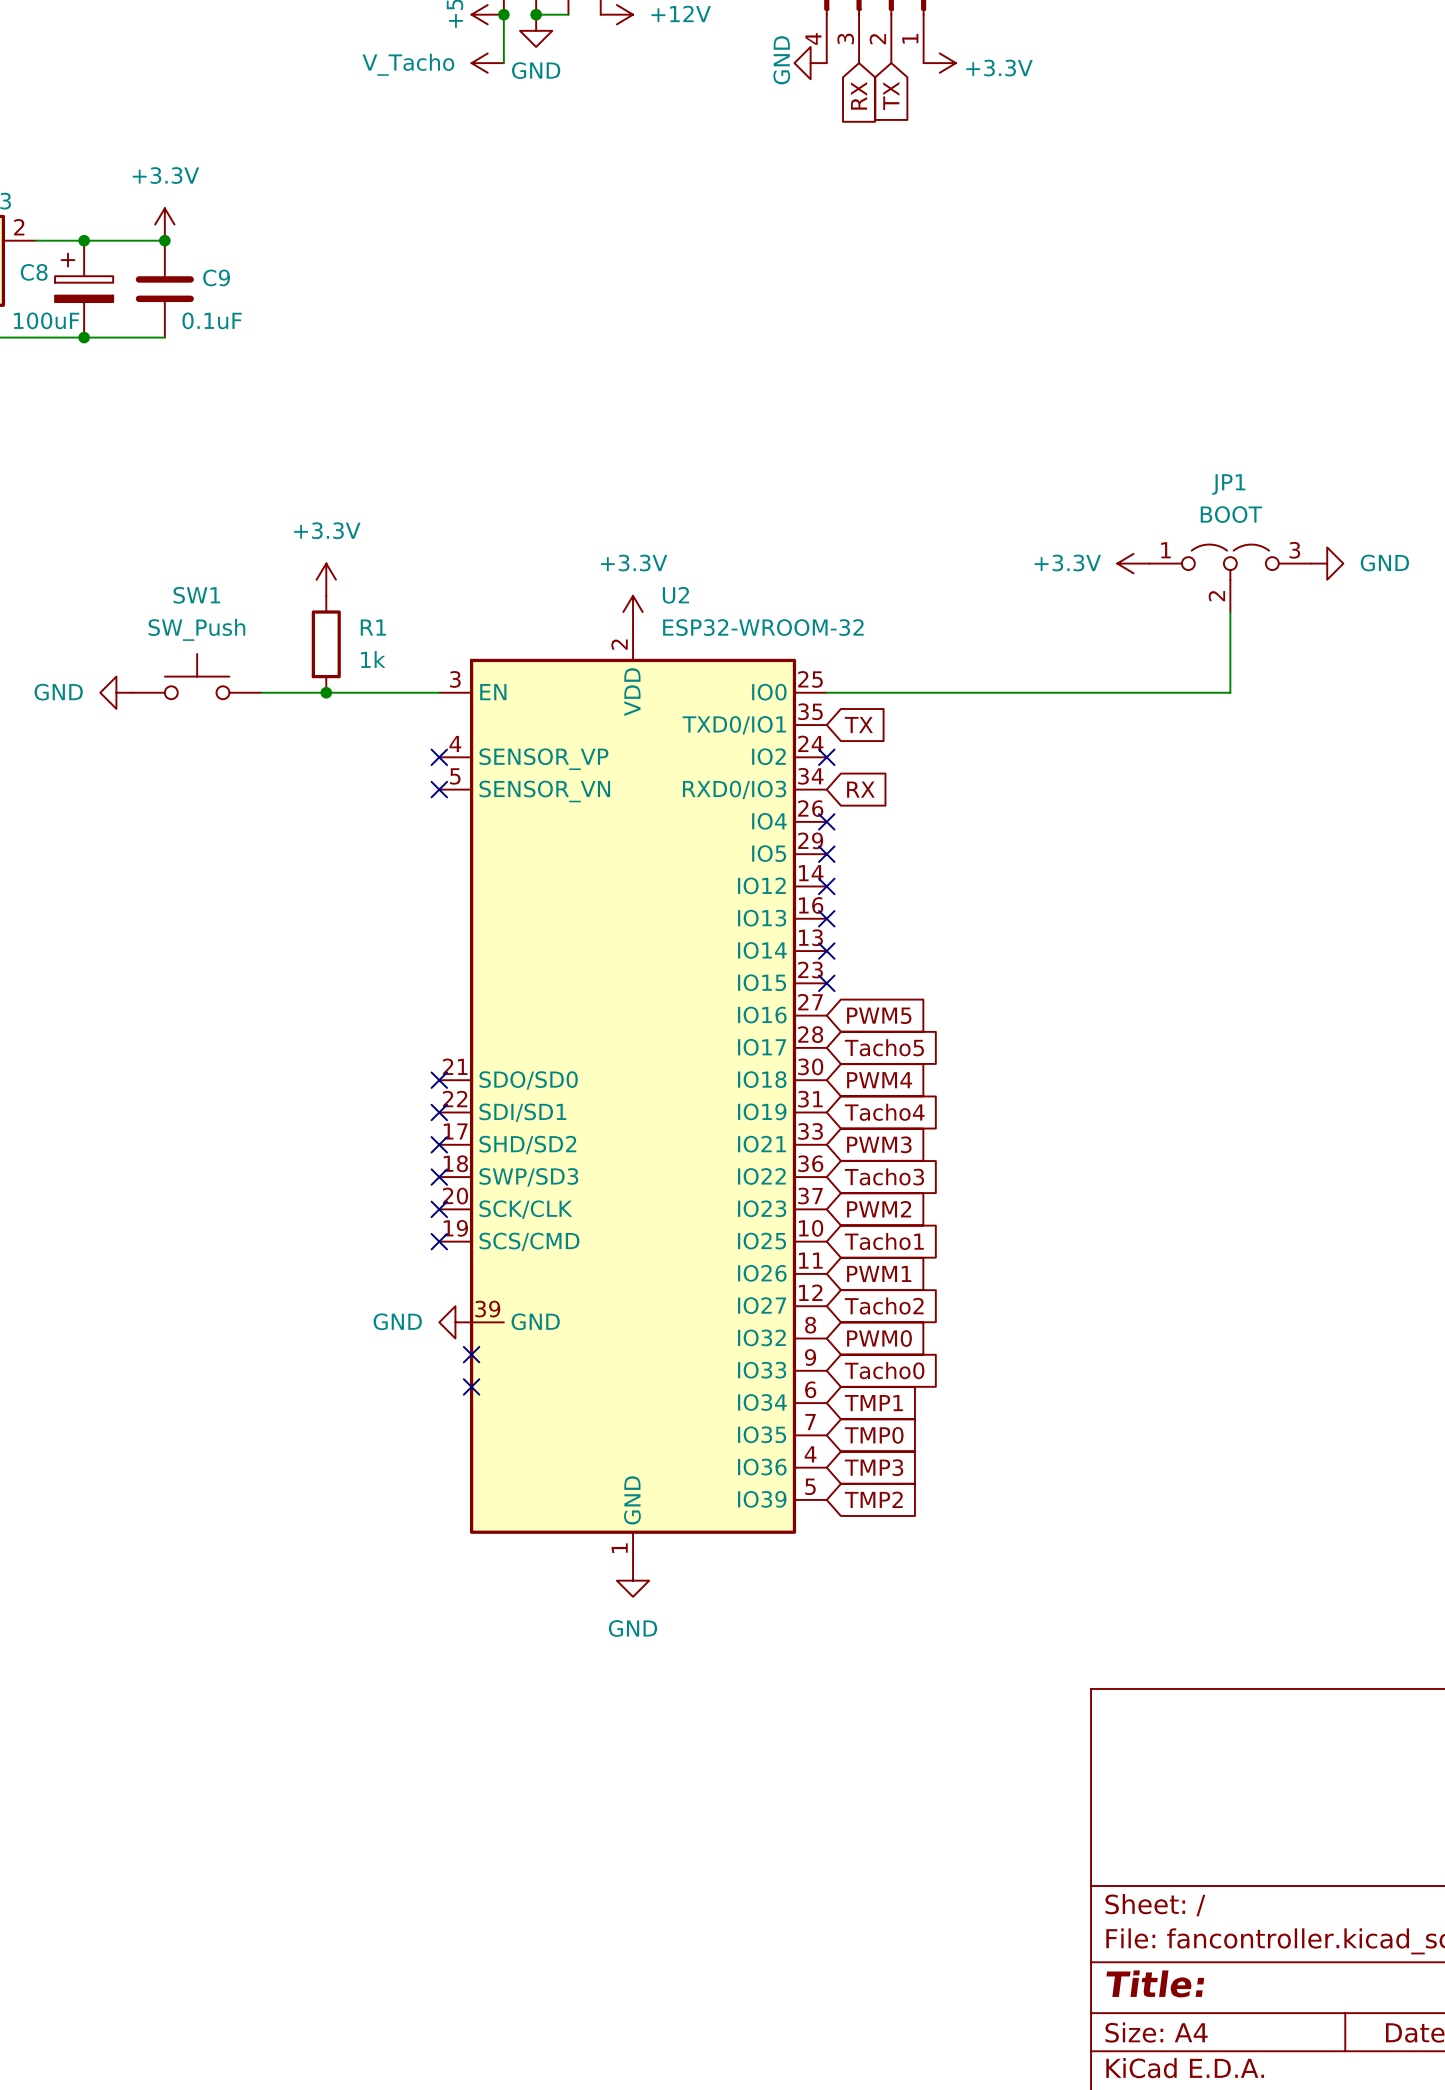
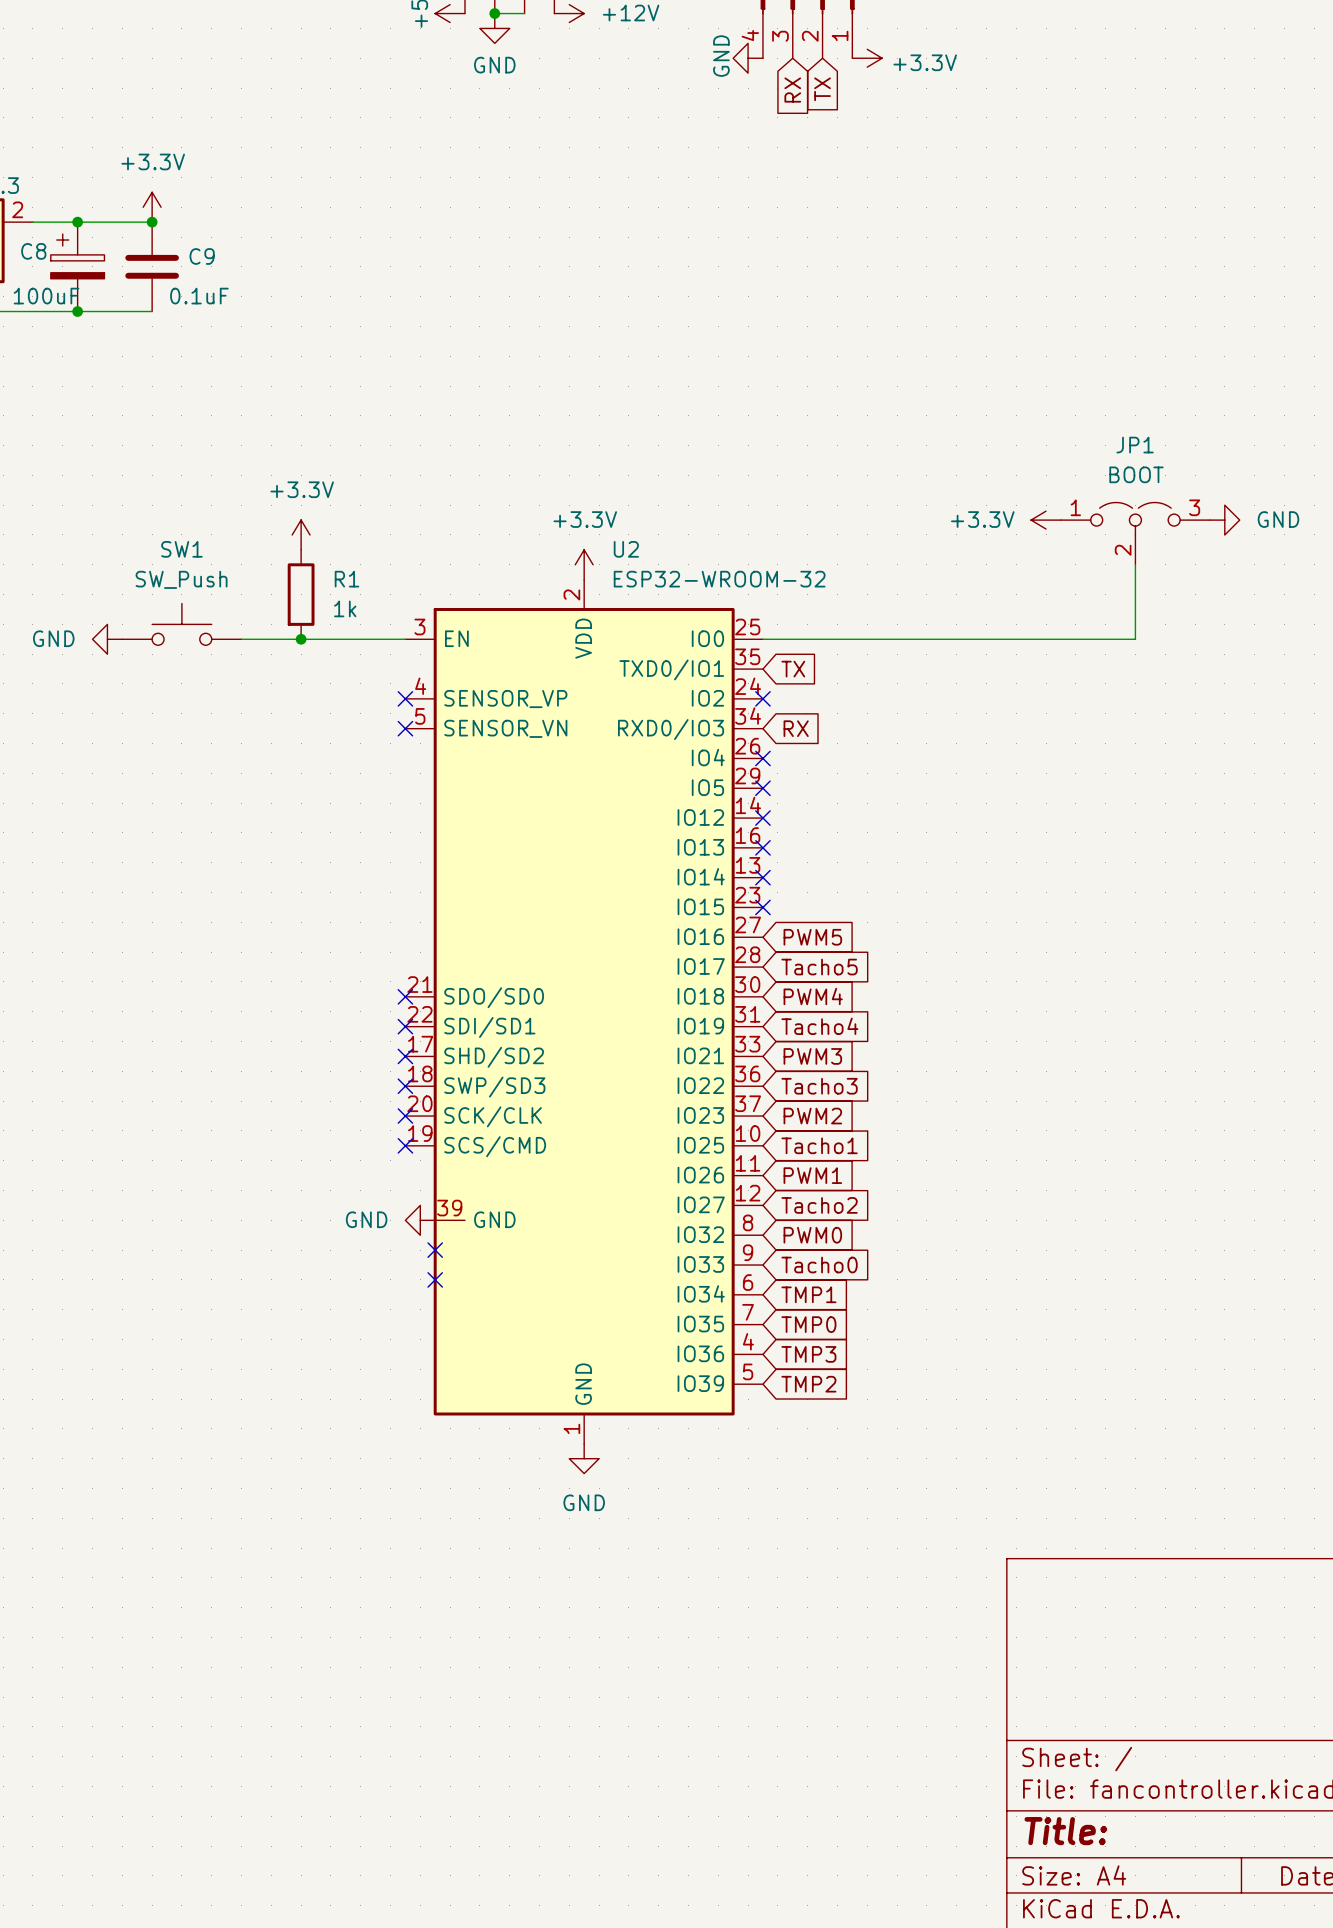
wire: (503, 14) (503, 63) -> none
junction: (503, 14) -> none
power symbol: V_Tacho (487, 63) -> none

